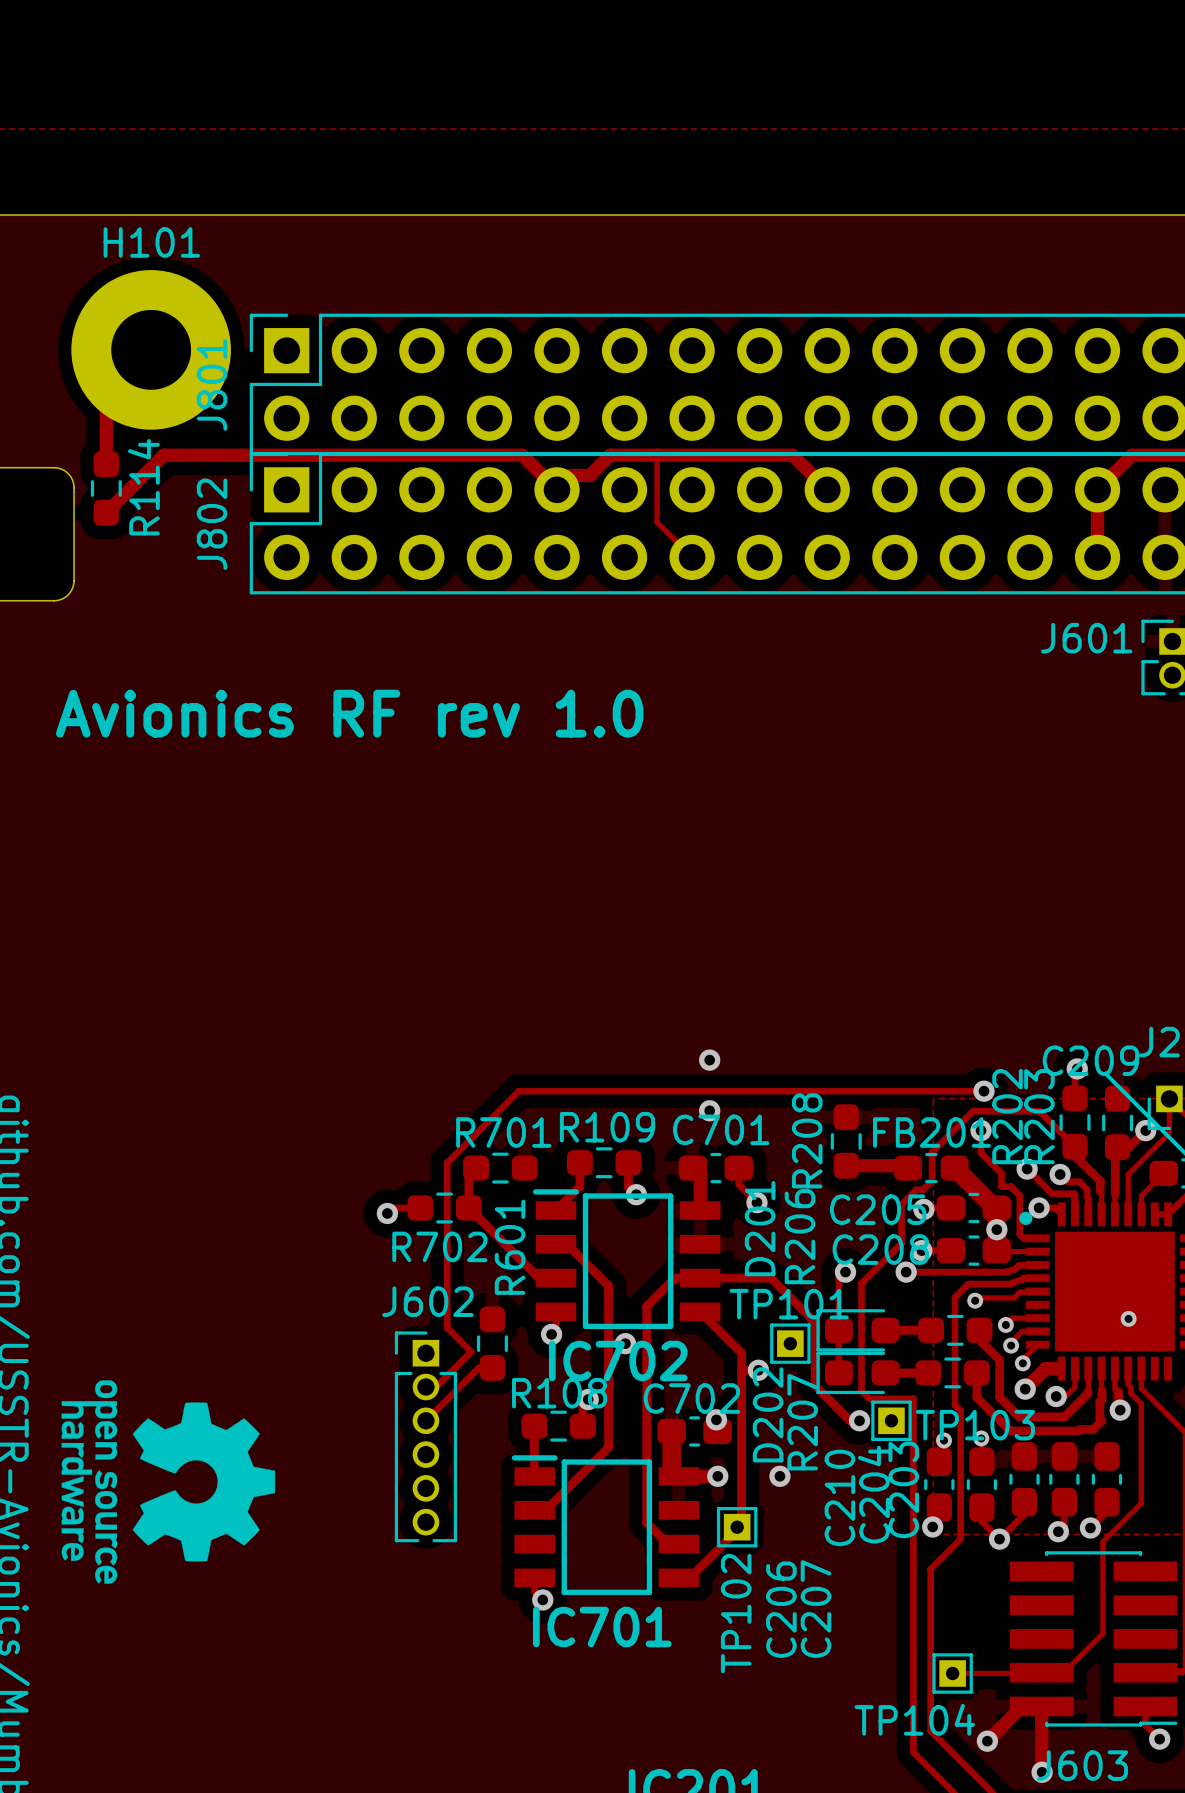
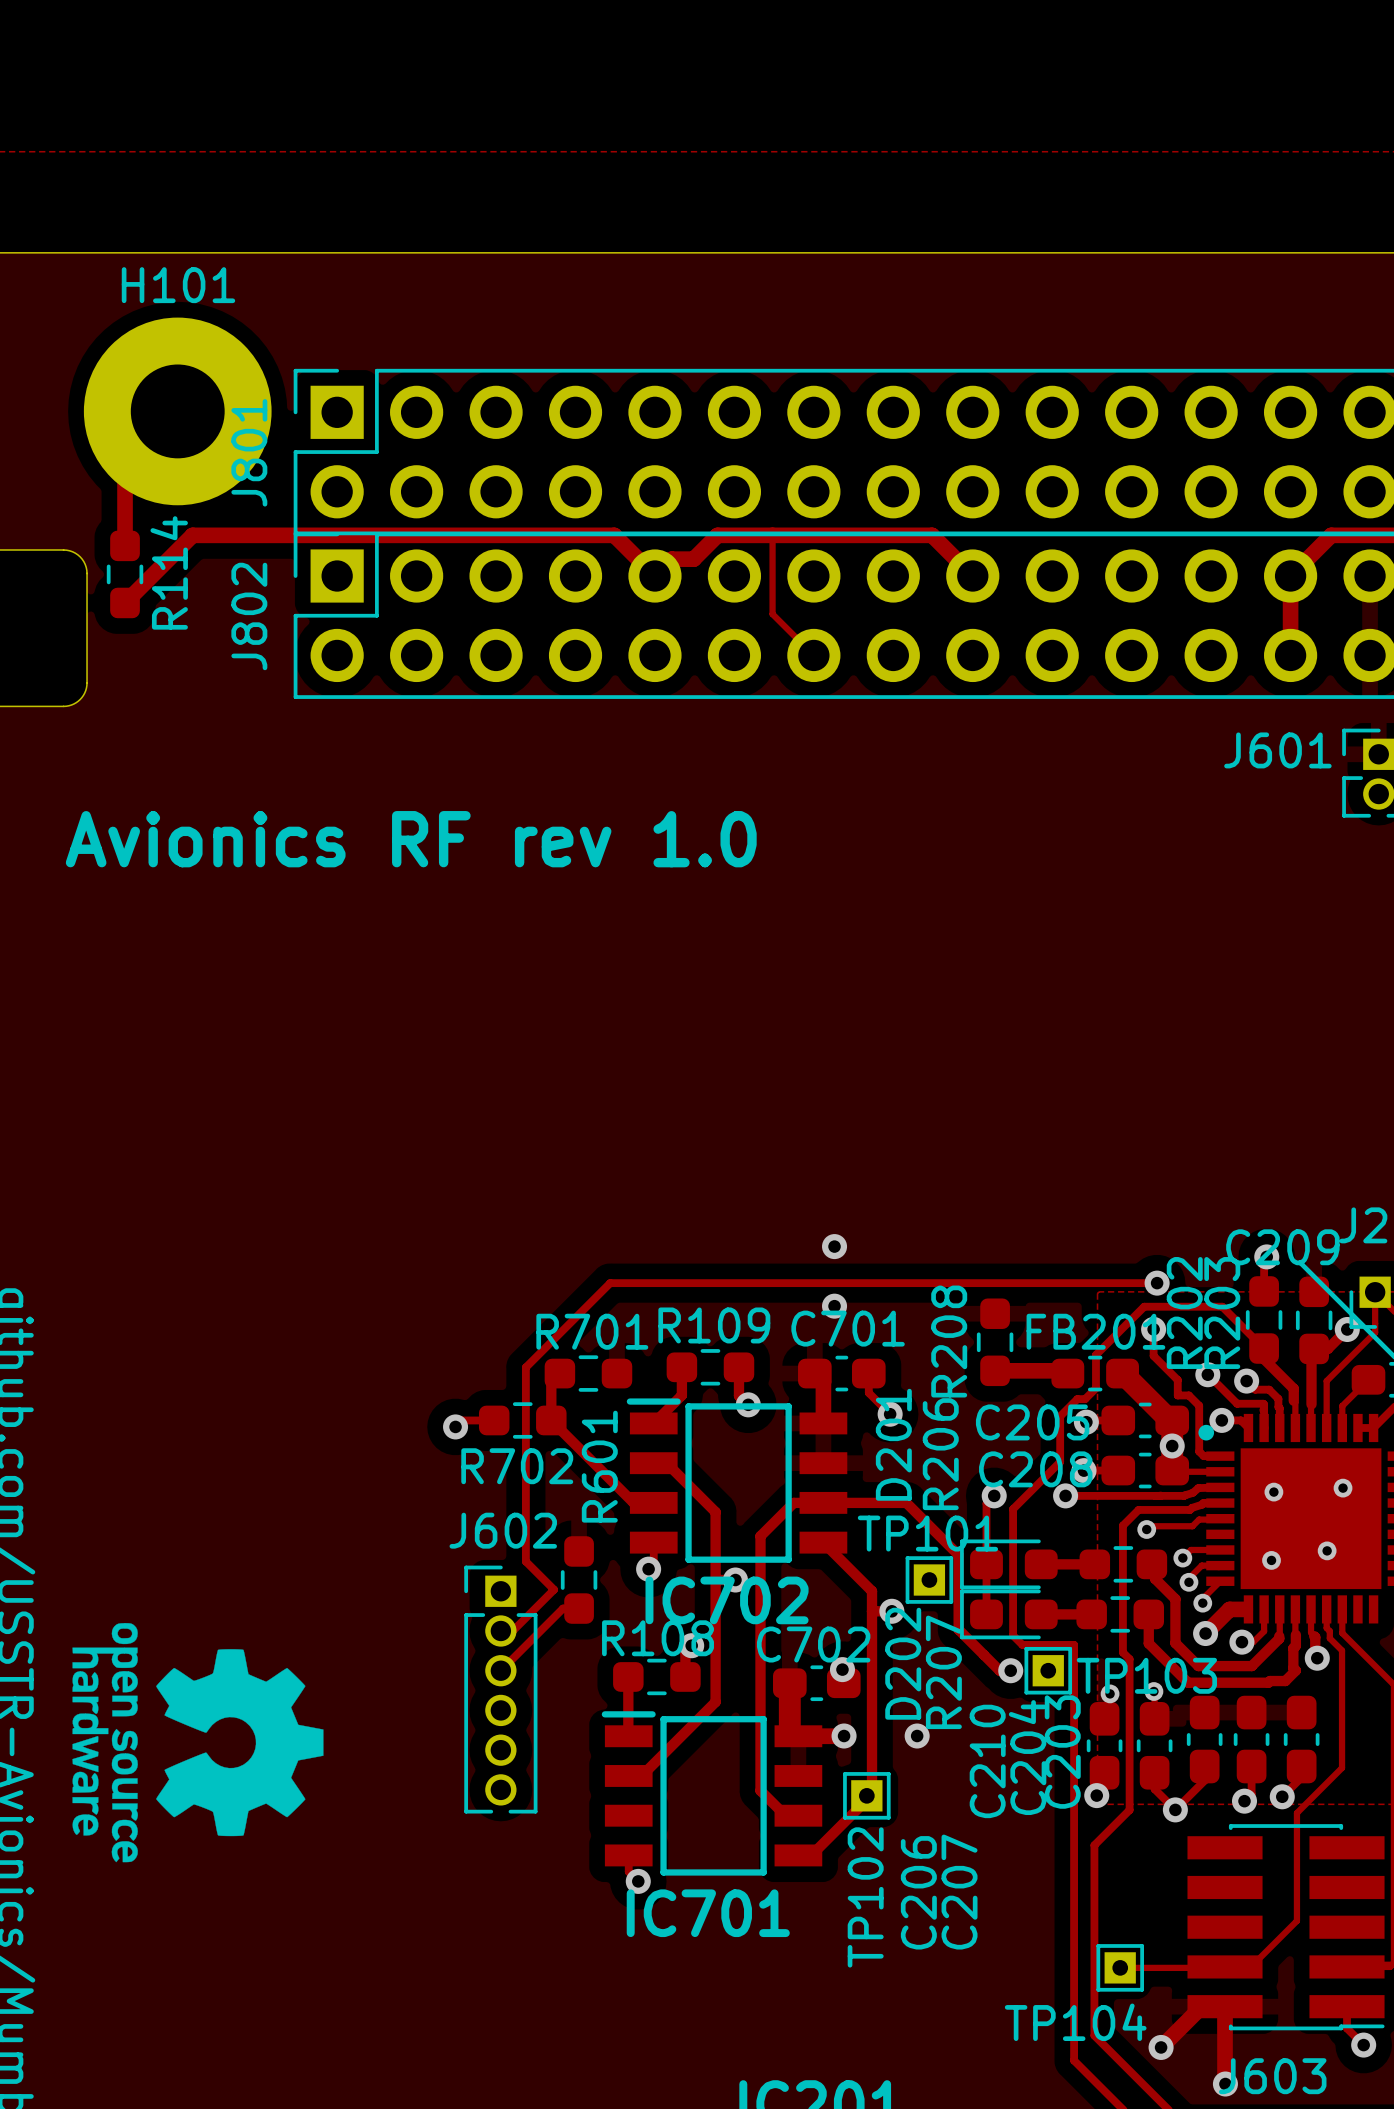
via: none -> (1343, 1488)
via: none -> (1273, 1492)
via: none -> (1271, 1560)

